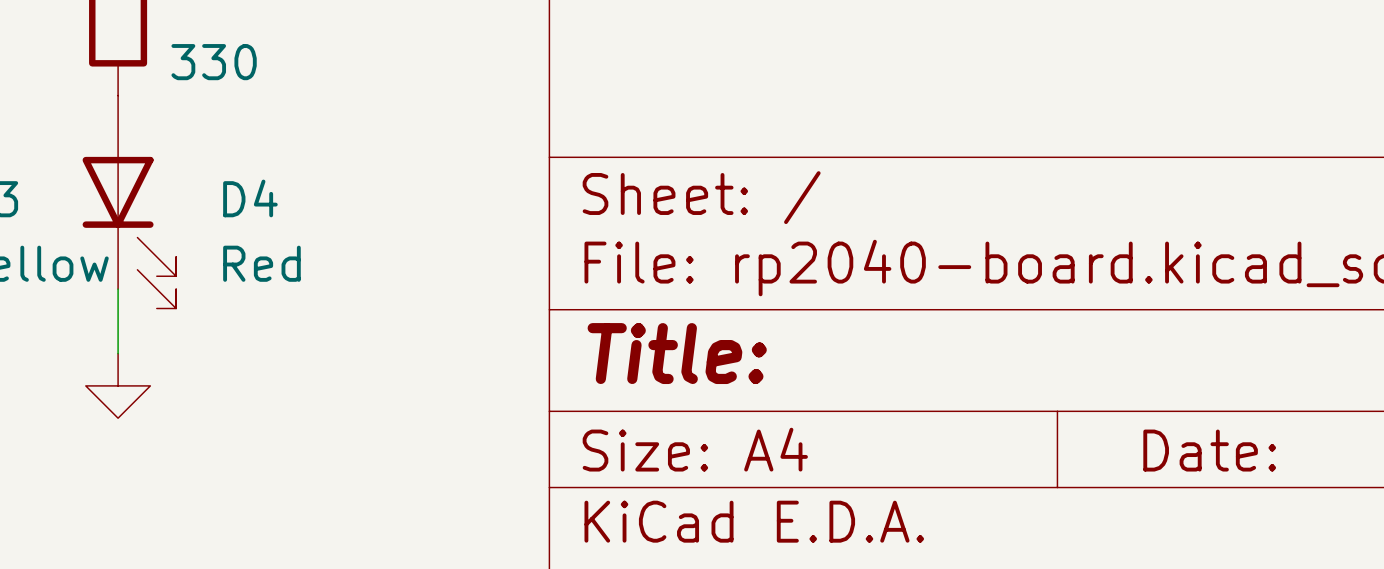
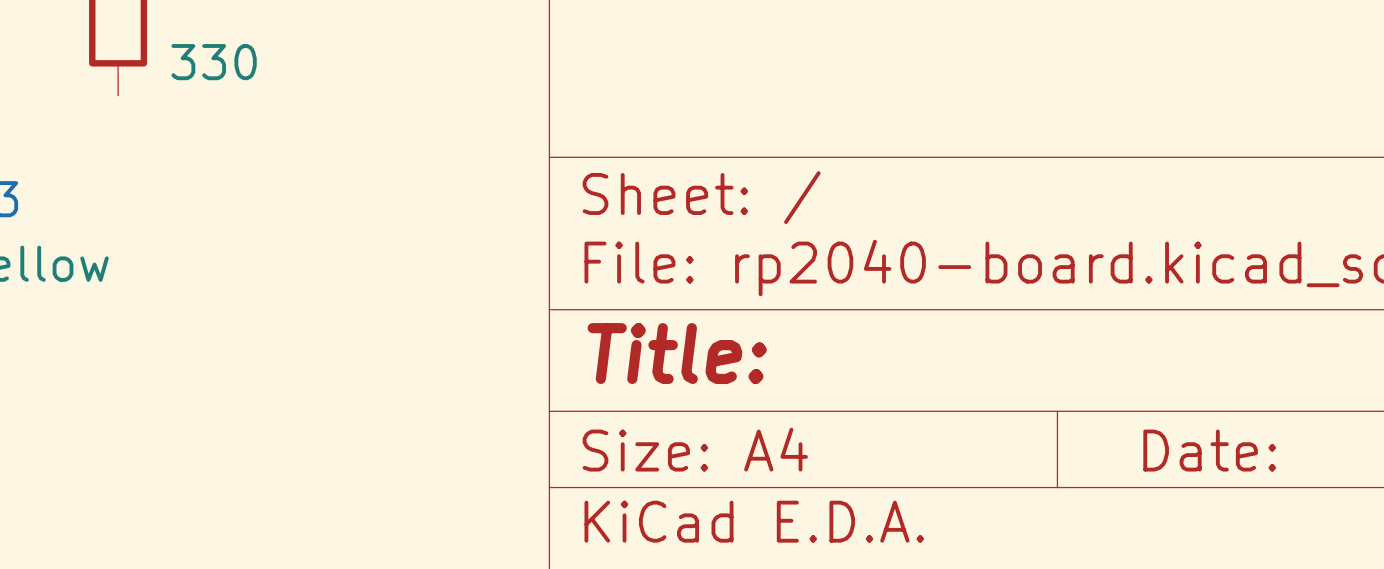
D4: Red (129, 202) -> none
wire: (118, 289) (118, 353) -> none
power symbol: (118, 385) -> none

